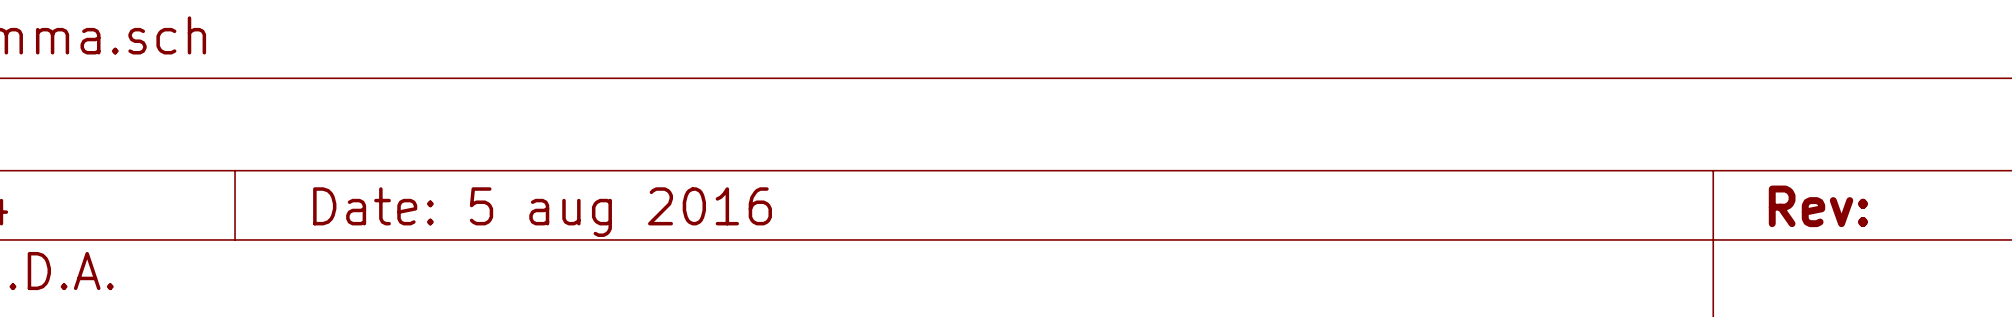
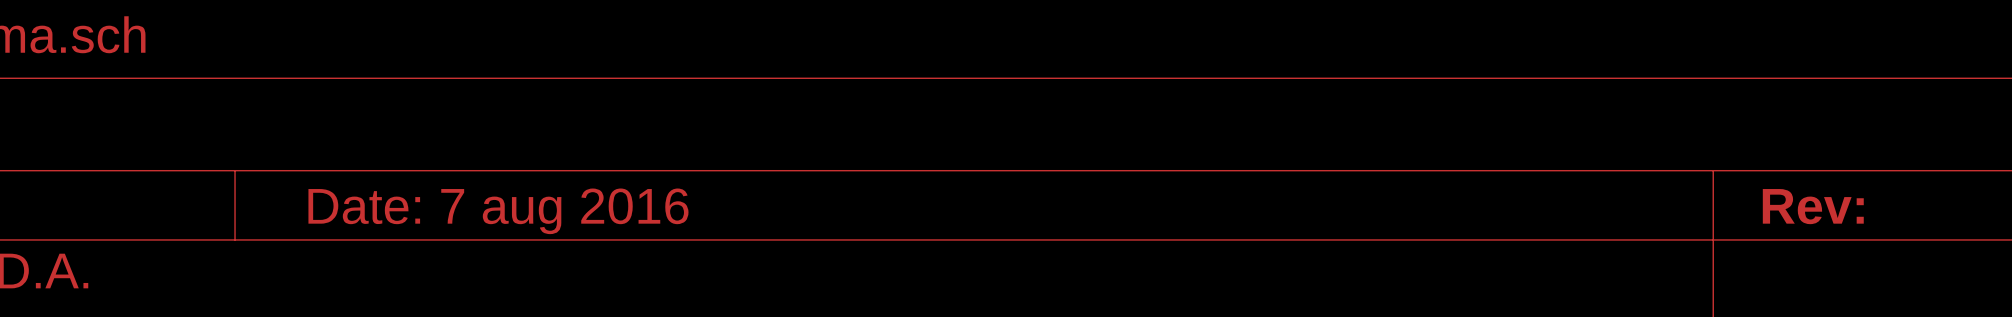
title block: Date: 5 aug 2016 (542, 212) -> Date: 7 aug 2016 (498, 211)

